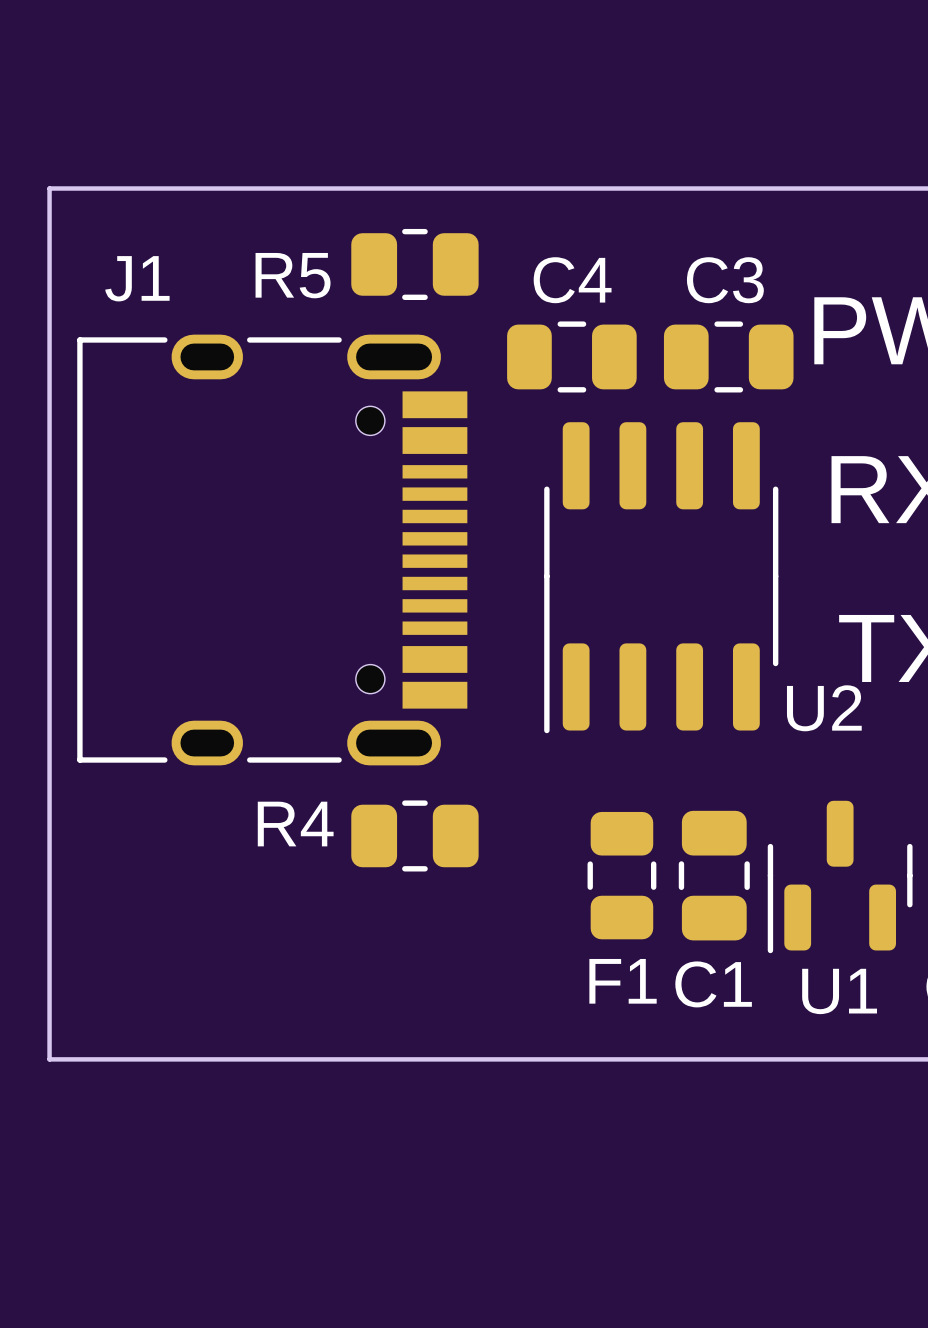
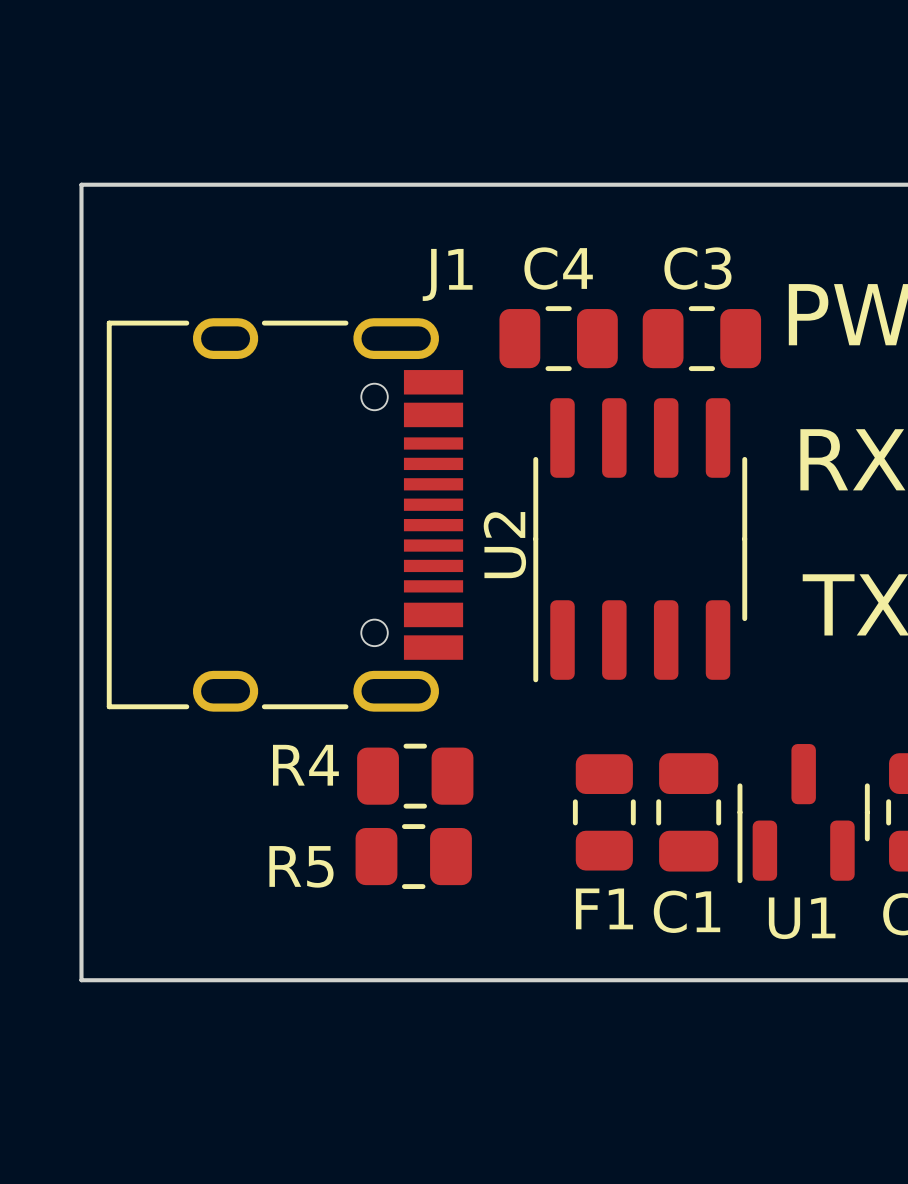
R5 position: (414, 264) -> (413, 856)
J1 name position: J1 (137, 278) -> J1 (447, 274)
U2 name rotation: 0° (824, 708) -> 90° counterclockwise (504, 545)
U2 name position: U2 (824, 708) -> U2 (504, 545)

